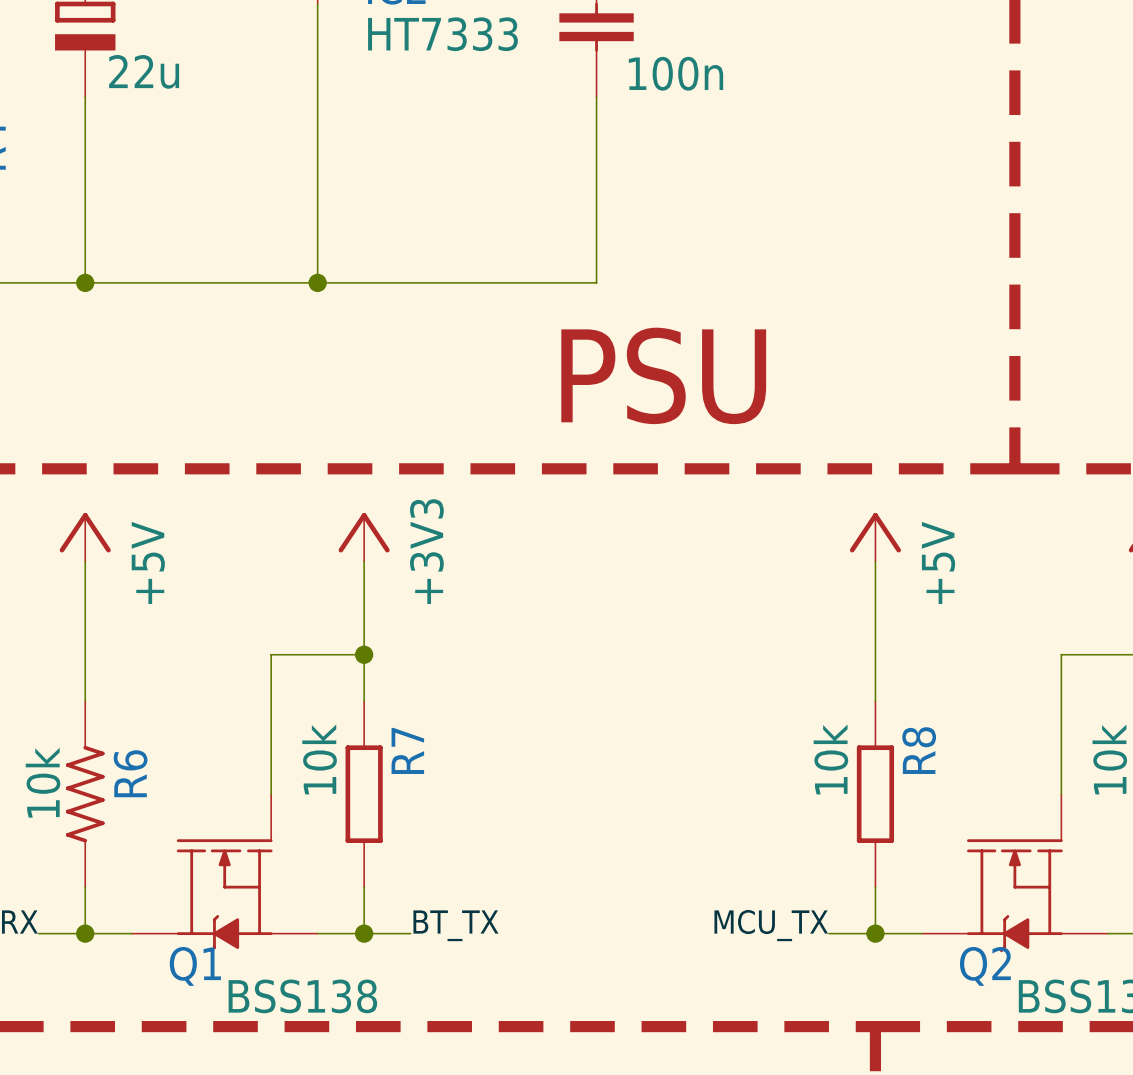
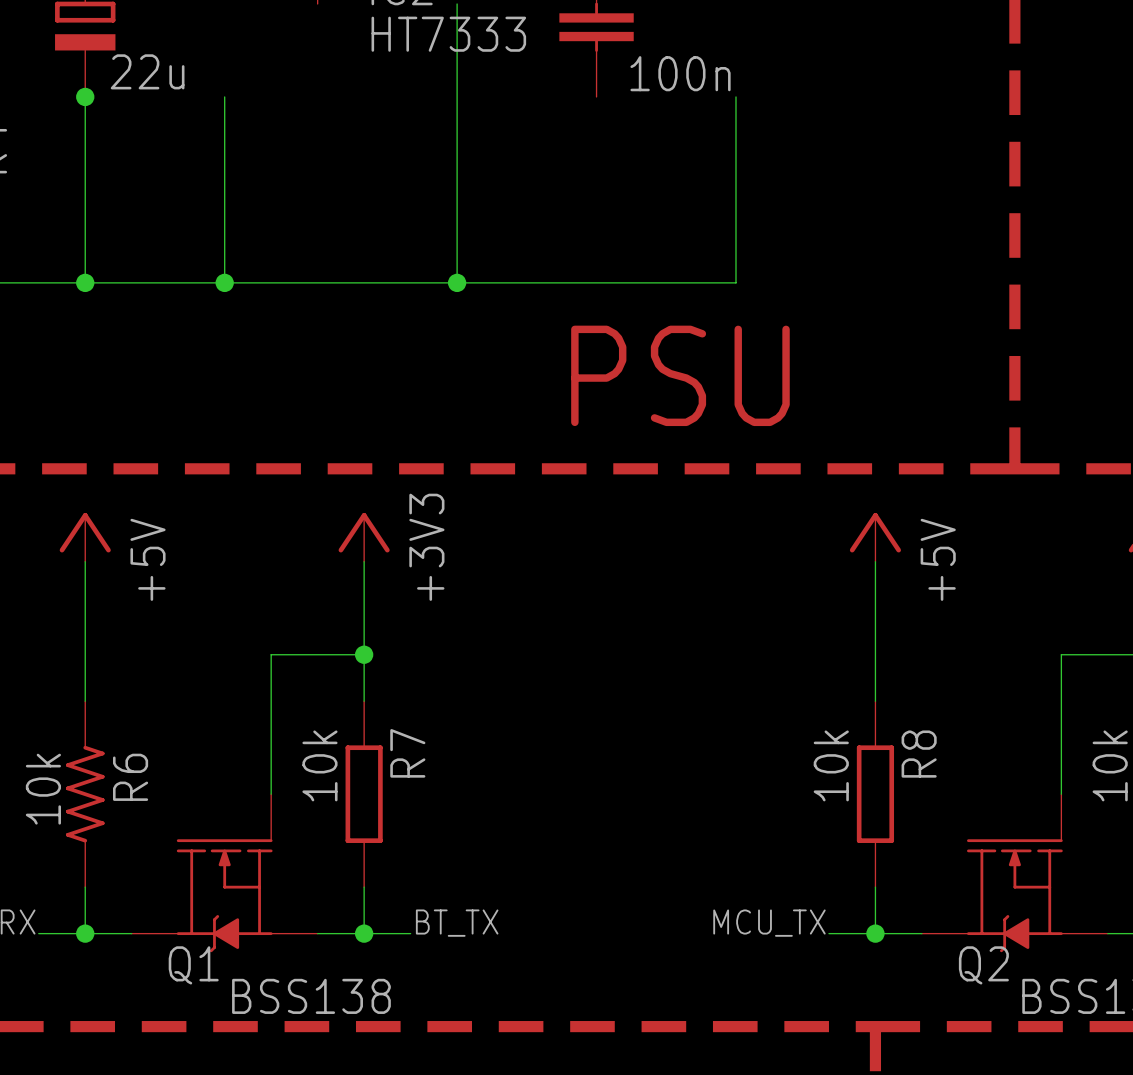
wire: (317, 3) (317, 282) -> (457, 3) (457, 282)
junction: none -> (85, 96)
wire: none -> (224, 96) (224, 282)
wire: (596, 96) (596, 282) -> (735, 96) (735, 282) (596, 282)
junction: none -> (224, 282)
junction: (317, 282) -> none
junction: none -> (457, 282)

